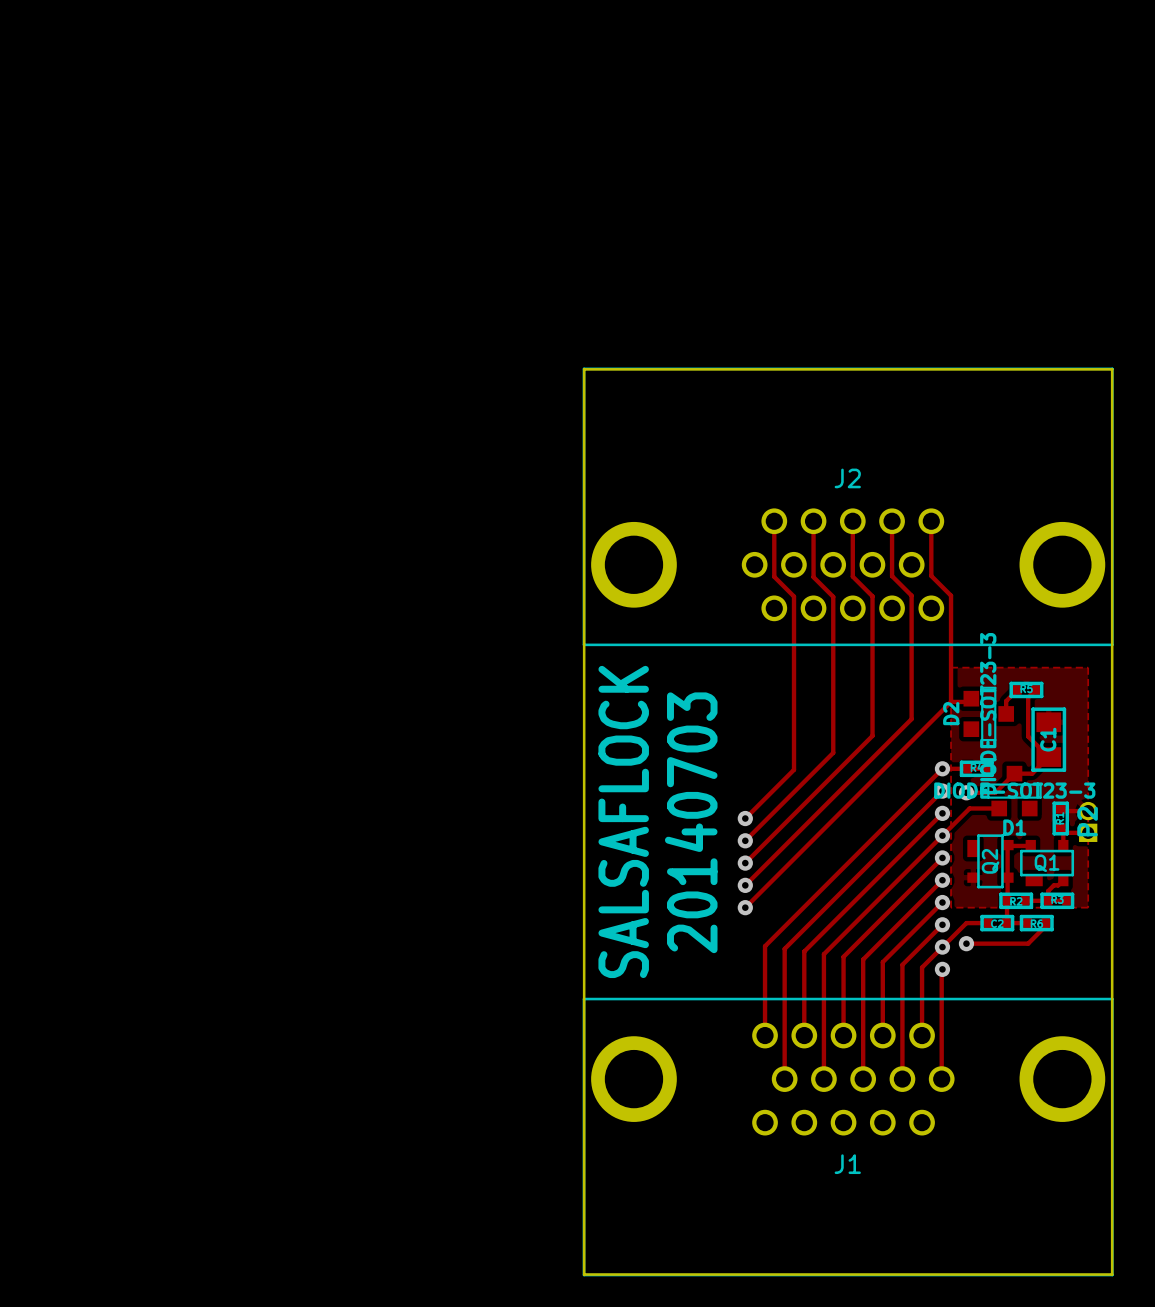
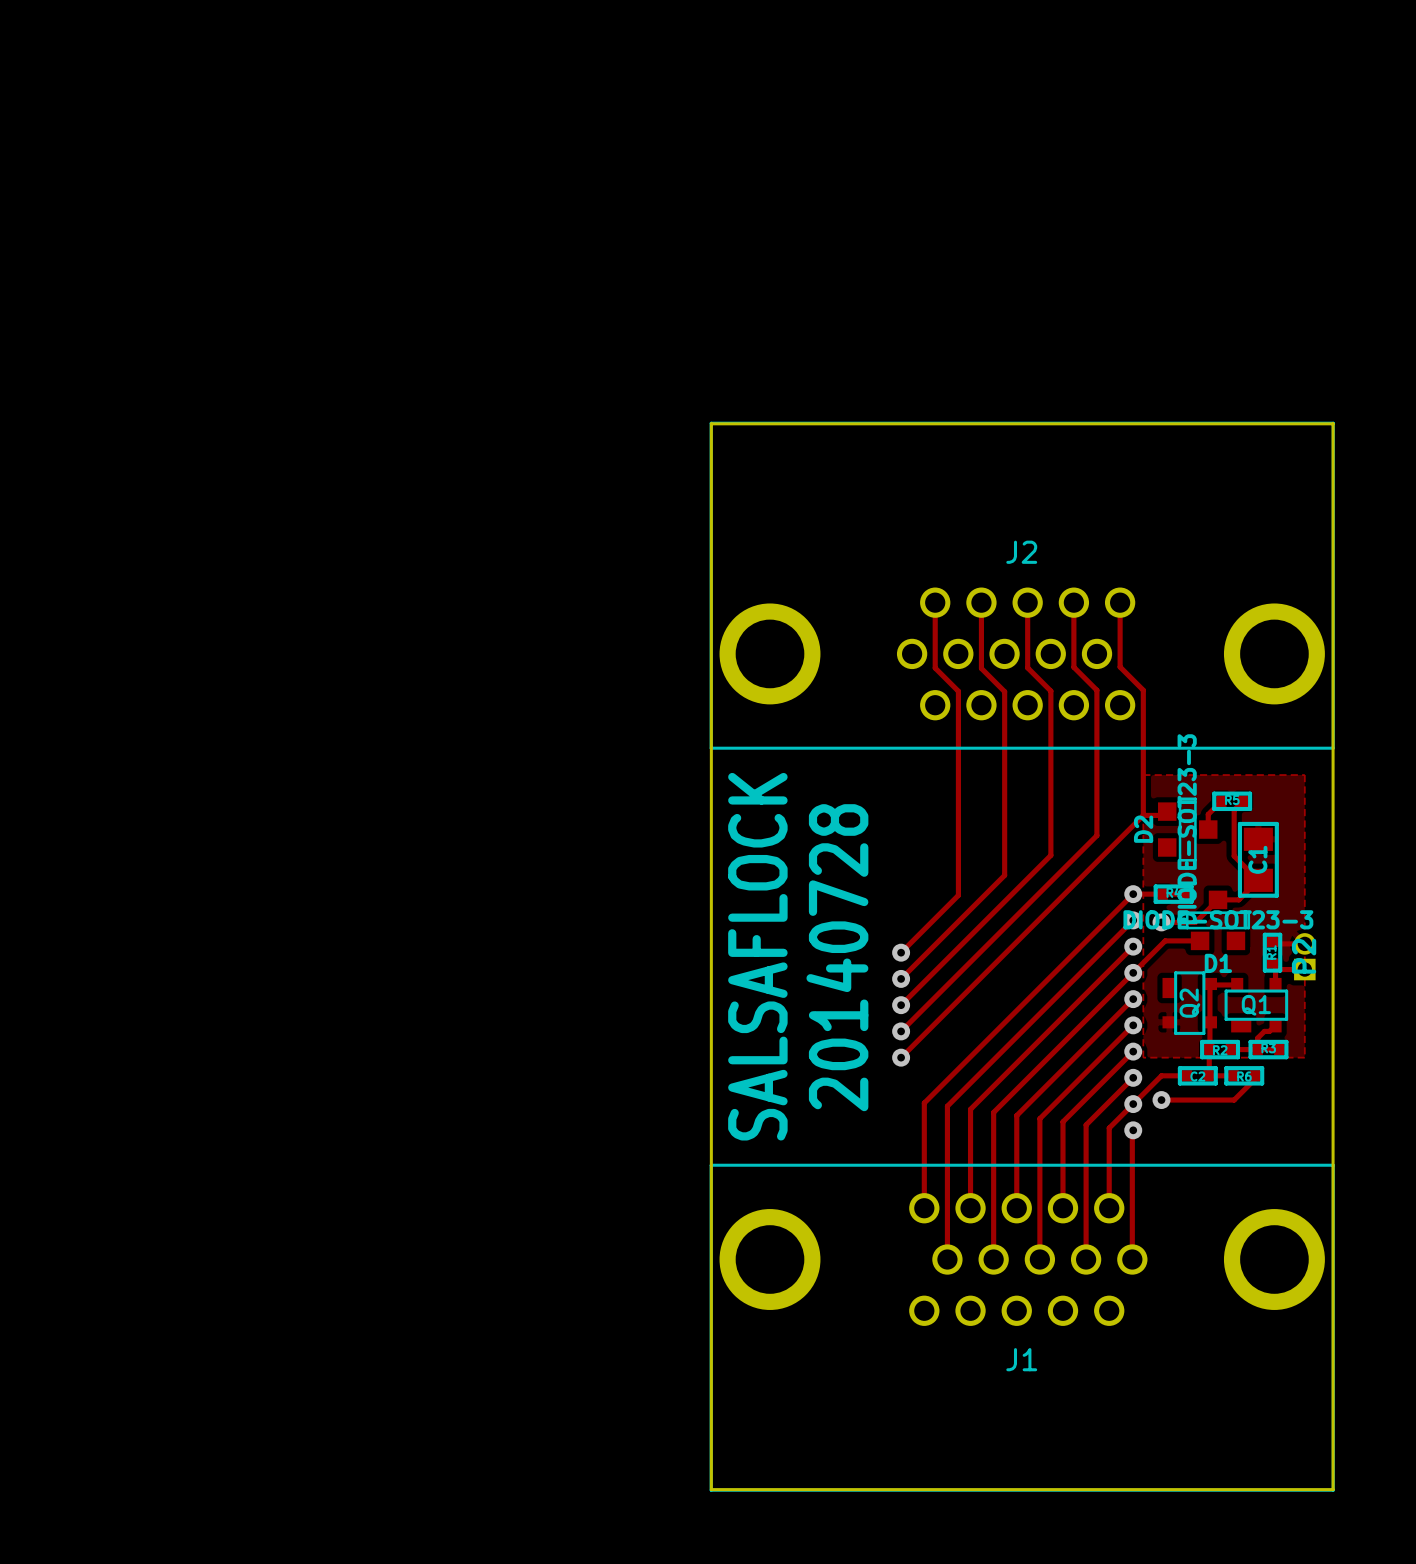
text: 20140703 (691, 822) -> 20140728 (837, 957)

